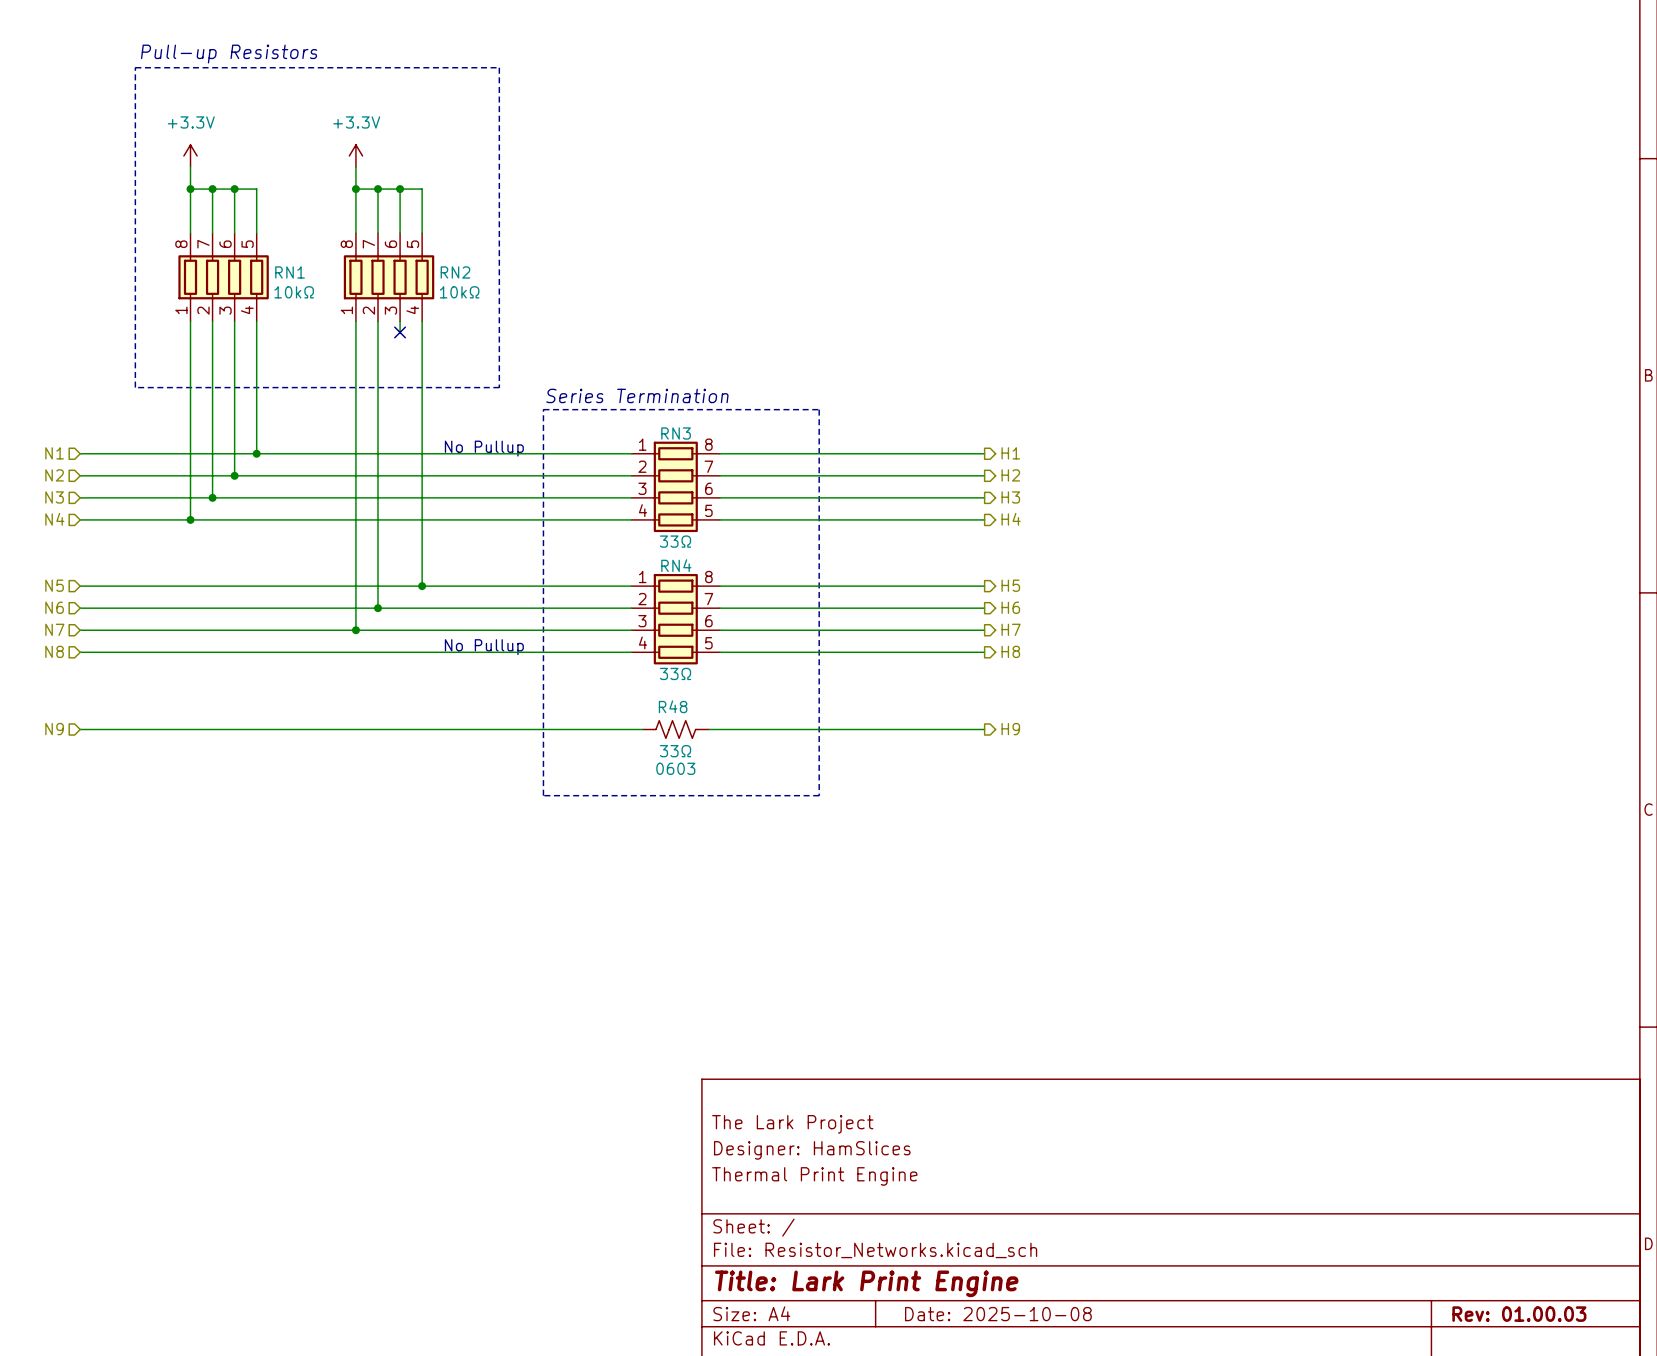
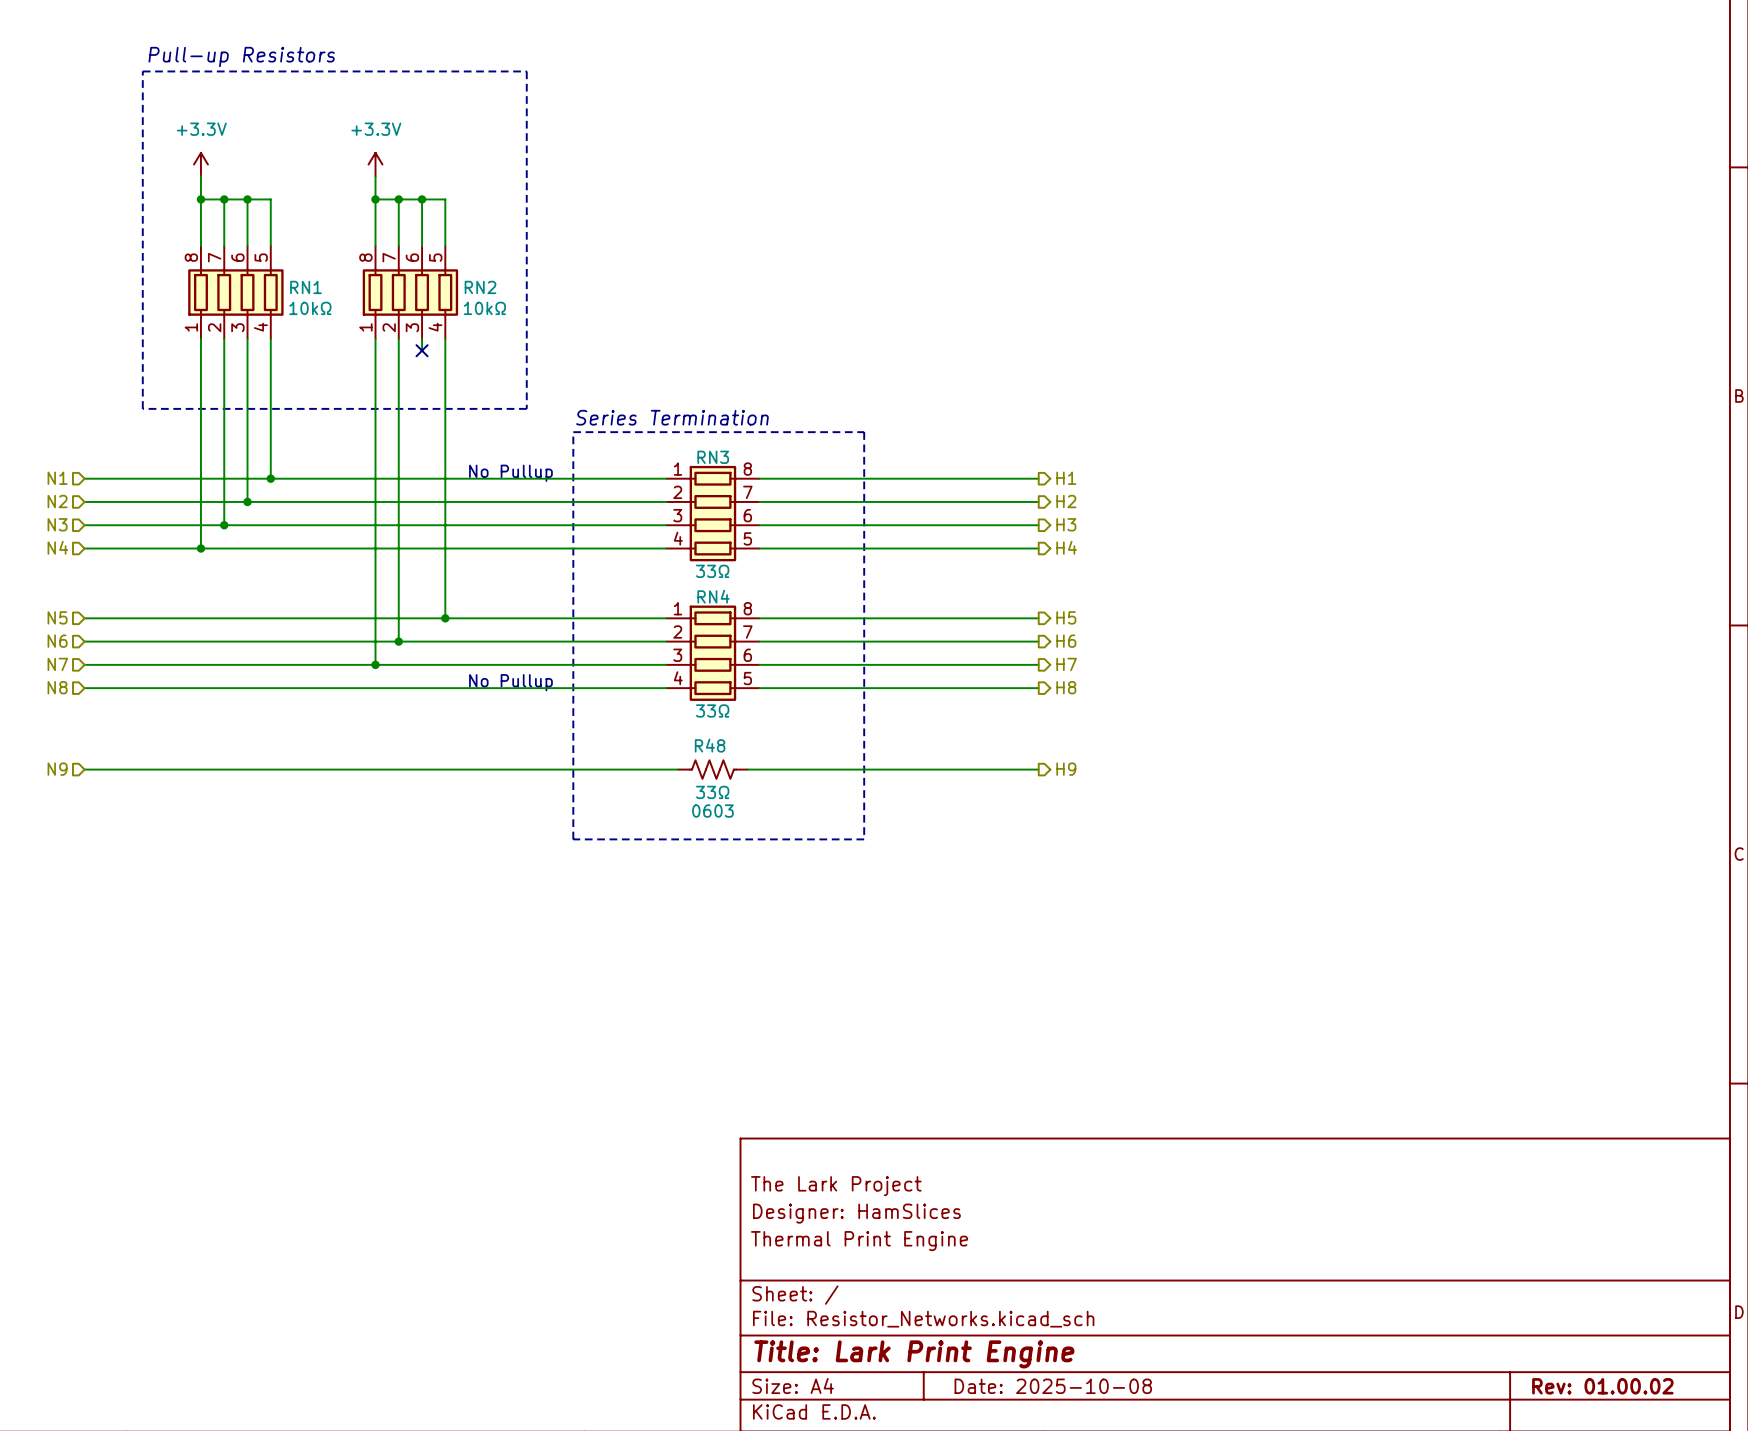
title block: Rev: 01.00.03 (1519, 1314) -> Rev: 01.00.02 (1602, 1386)

